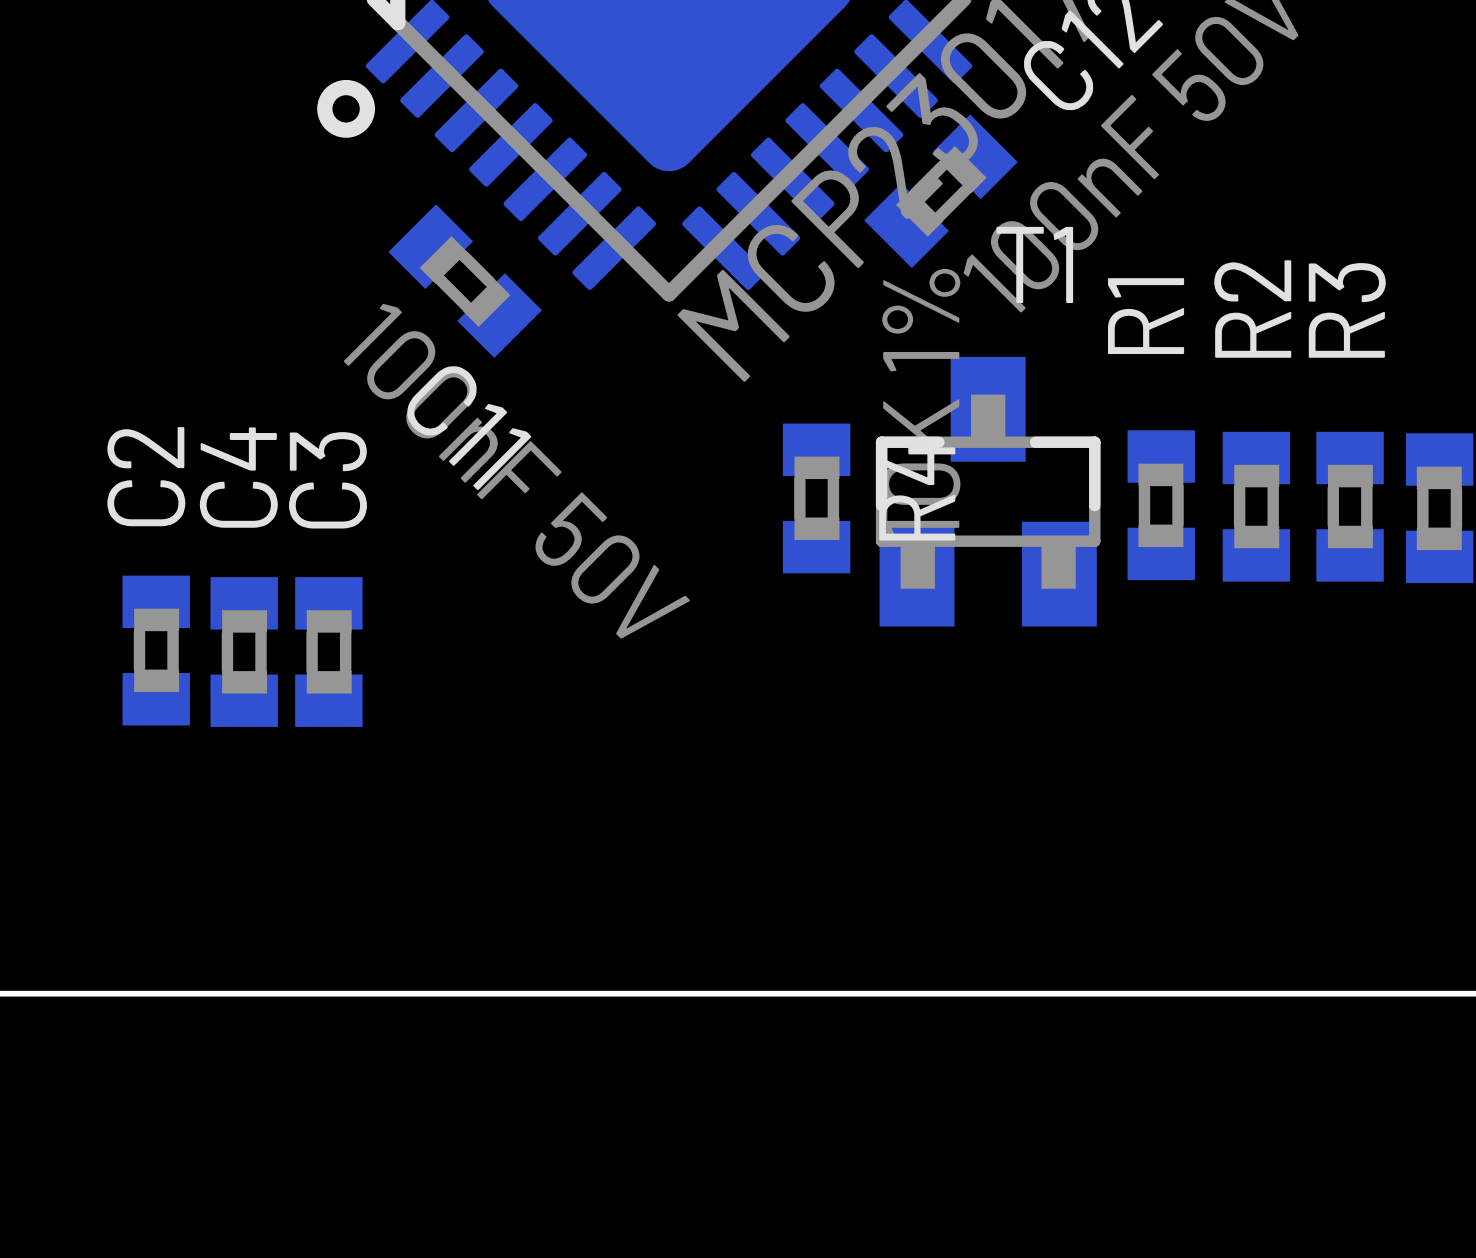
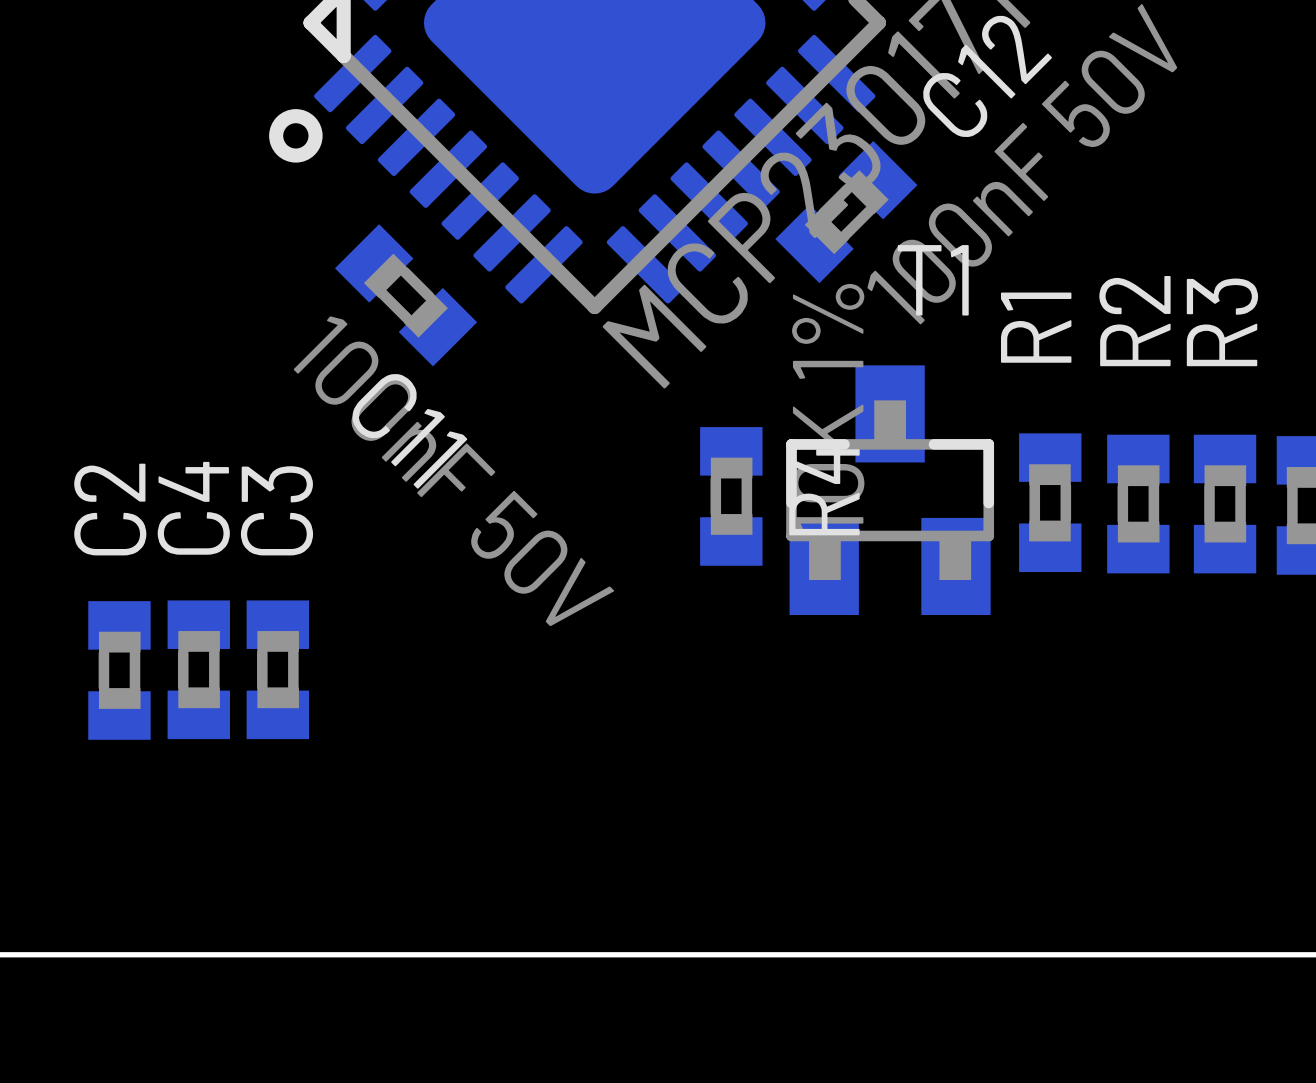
C2 position: (156, 650) -> (119, 670)
C4 position: (244, 652) -> (198, 669)
C3 position: (328, 652) -> (277, 669)

